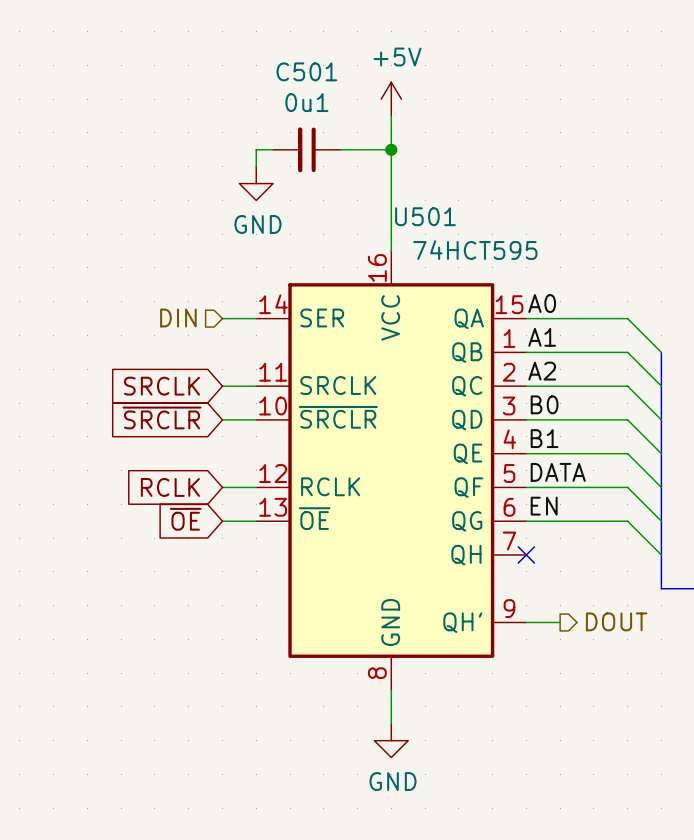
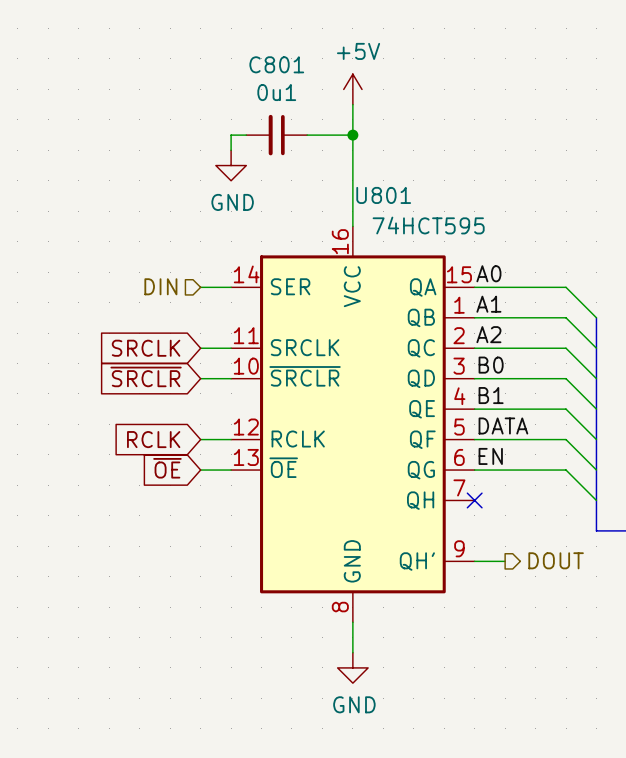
C501 name: C501 (306, 71) -> C801 (276, 64)
U501 name: U501 (425, 216) -> U801 (383, 195)

